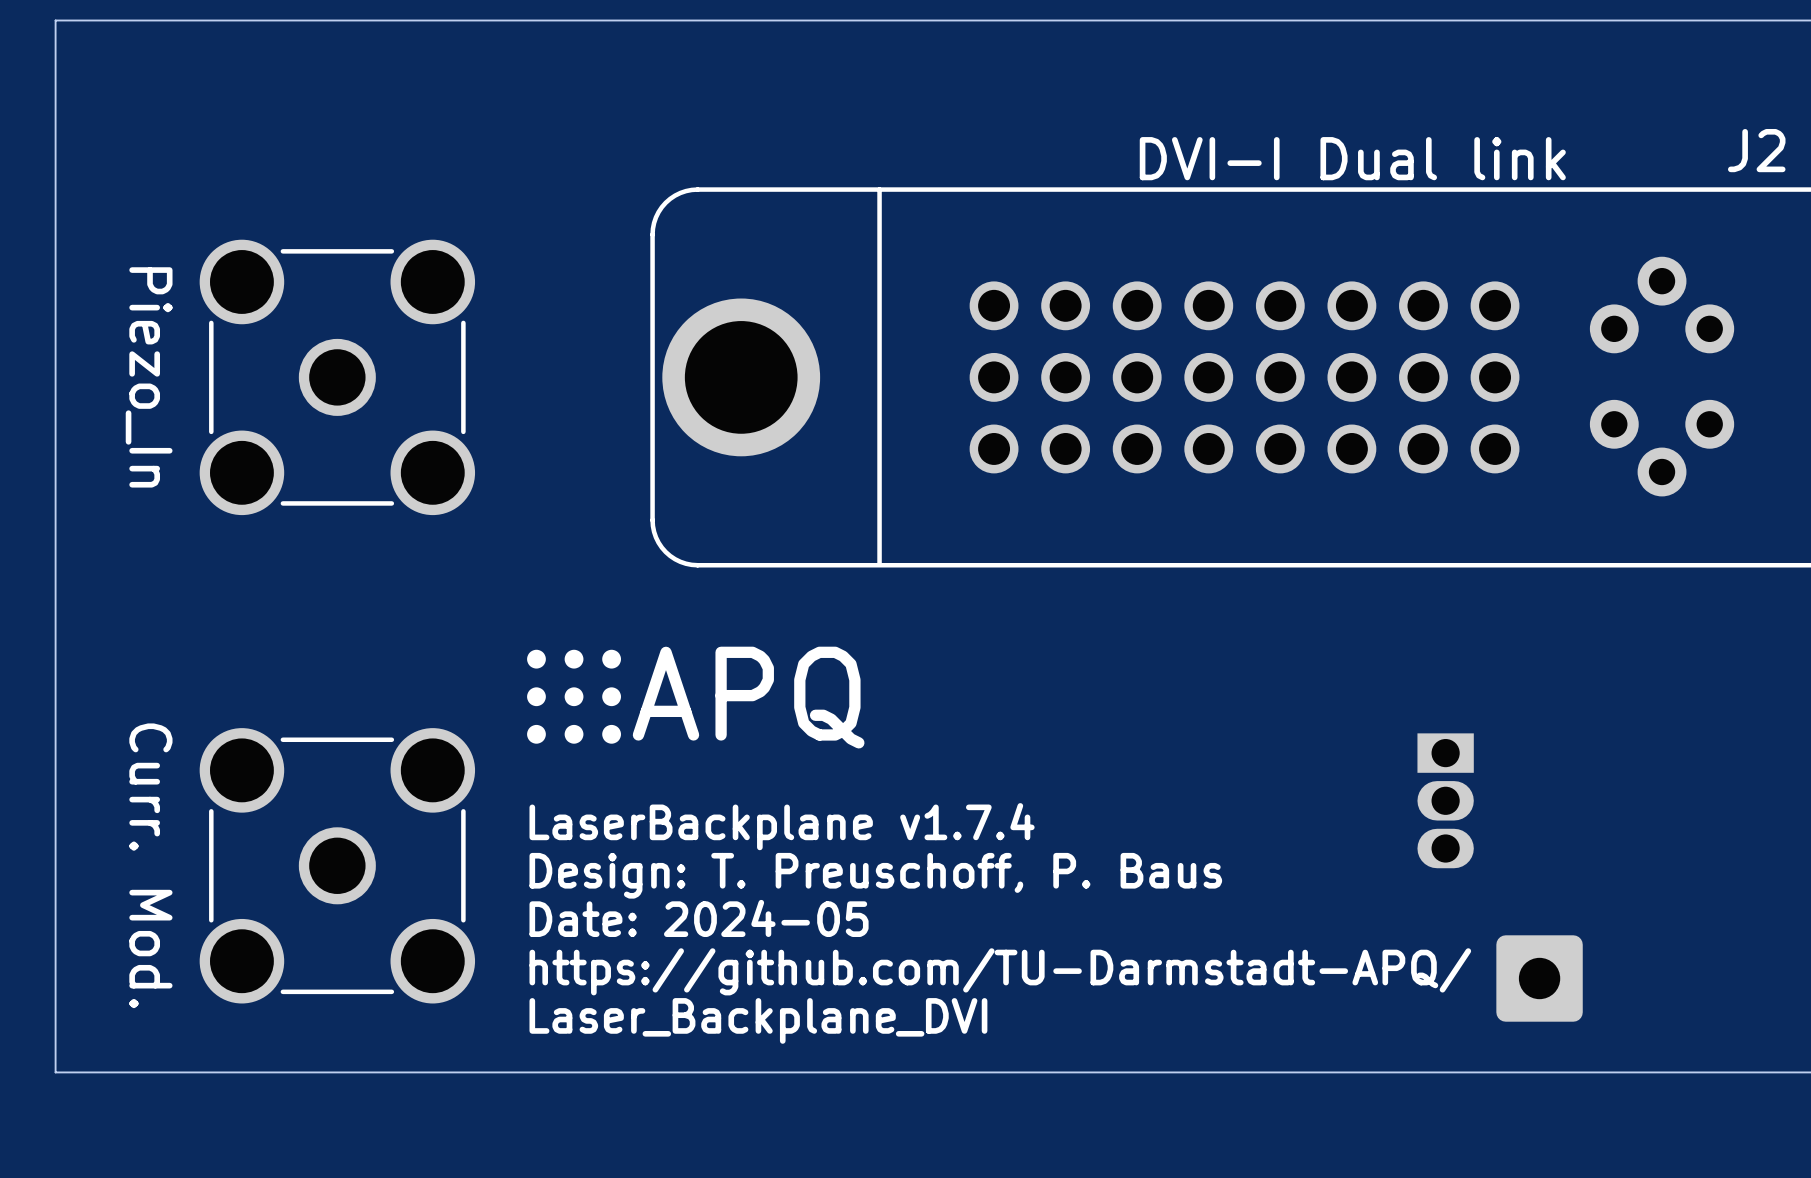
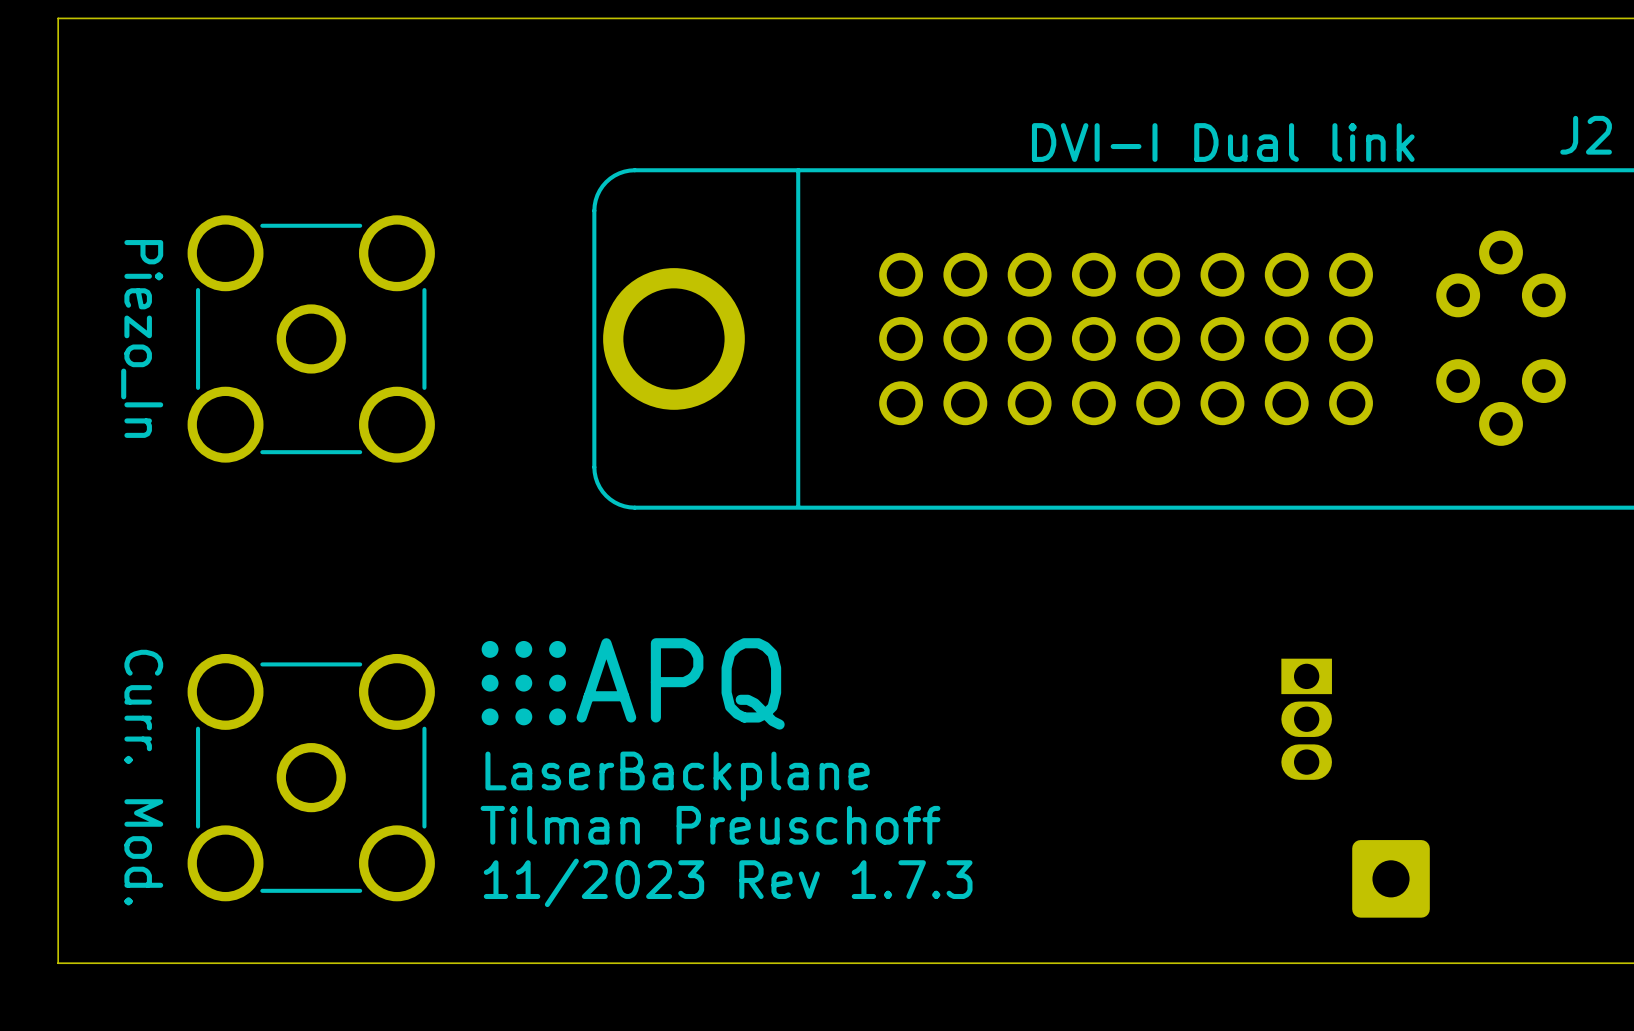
drawing position: (574, 696) -> (523, 683)
text: LaserBackplane v1.7.4 (782, 826) -> none
text: Design: T. Preuschoff, P. Baus (875, 875) -> LaserBackplane (677, 776)
text: Date: 2024-05 (699, 918) -> Tilman Preuschoff (710, 825)
text: https://github.com/TU-Darmstadt-APQ/ (1000, 971) -> 11/2023 Rev 1.7.3 (728, 882)
text: Laser_Backplane_DVI (758, 1020) -> none

